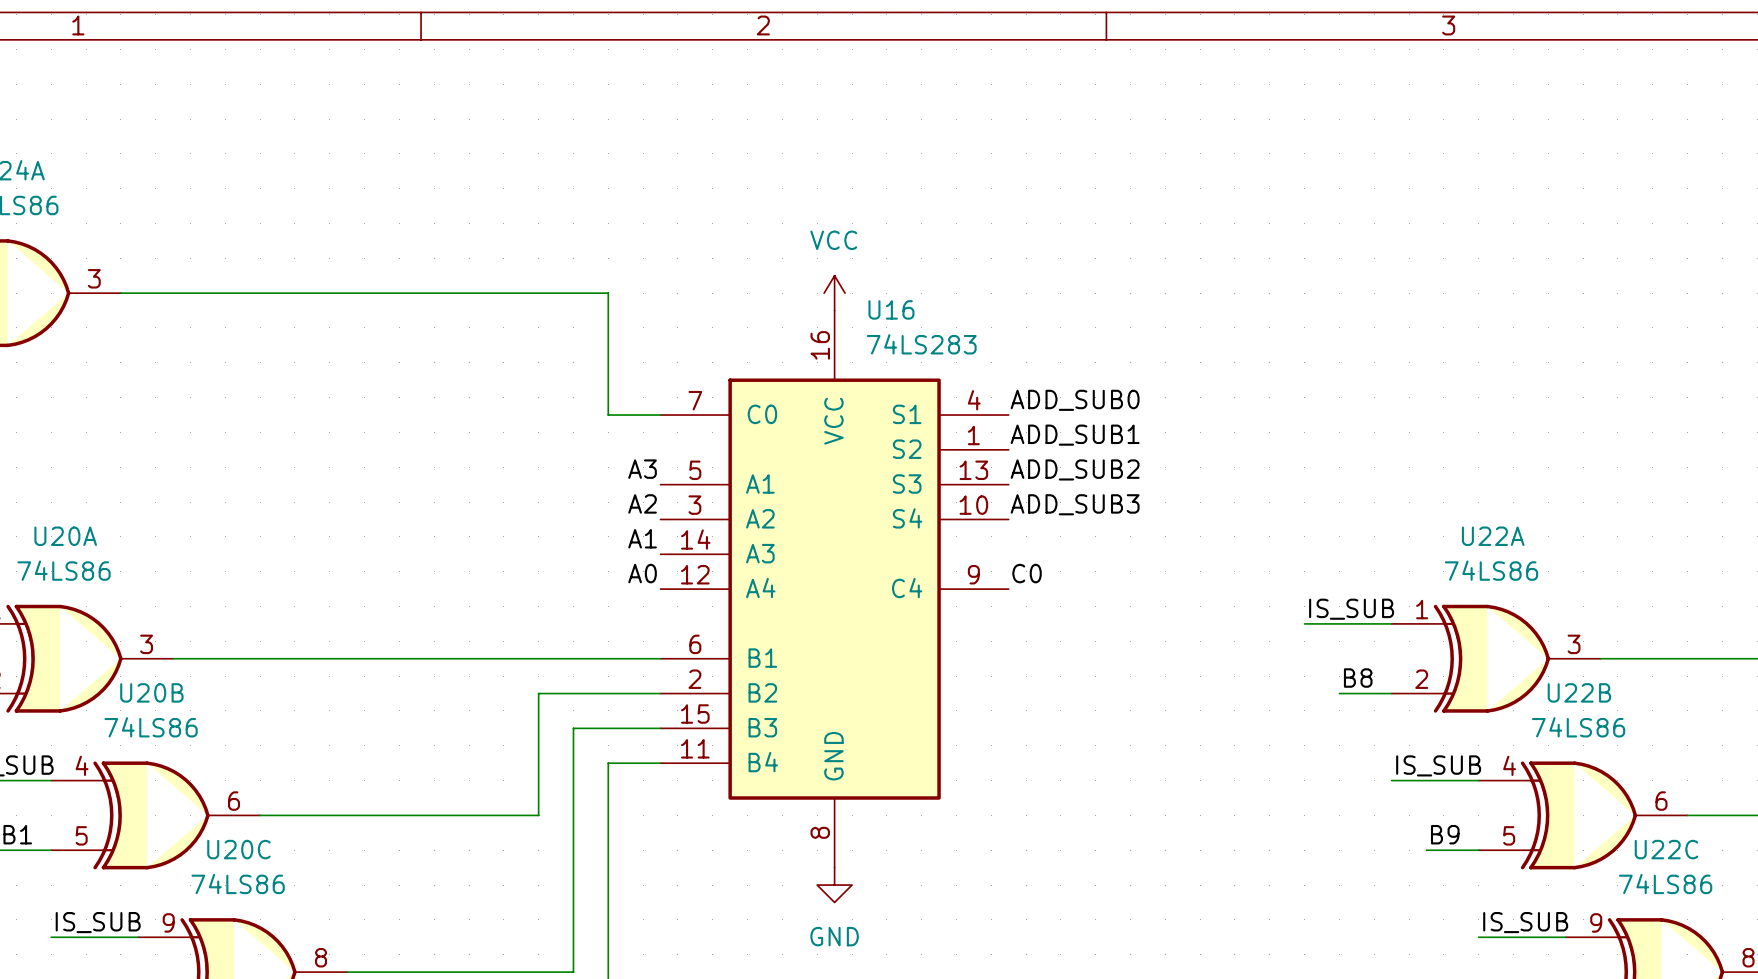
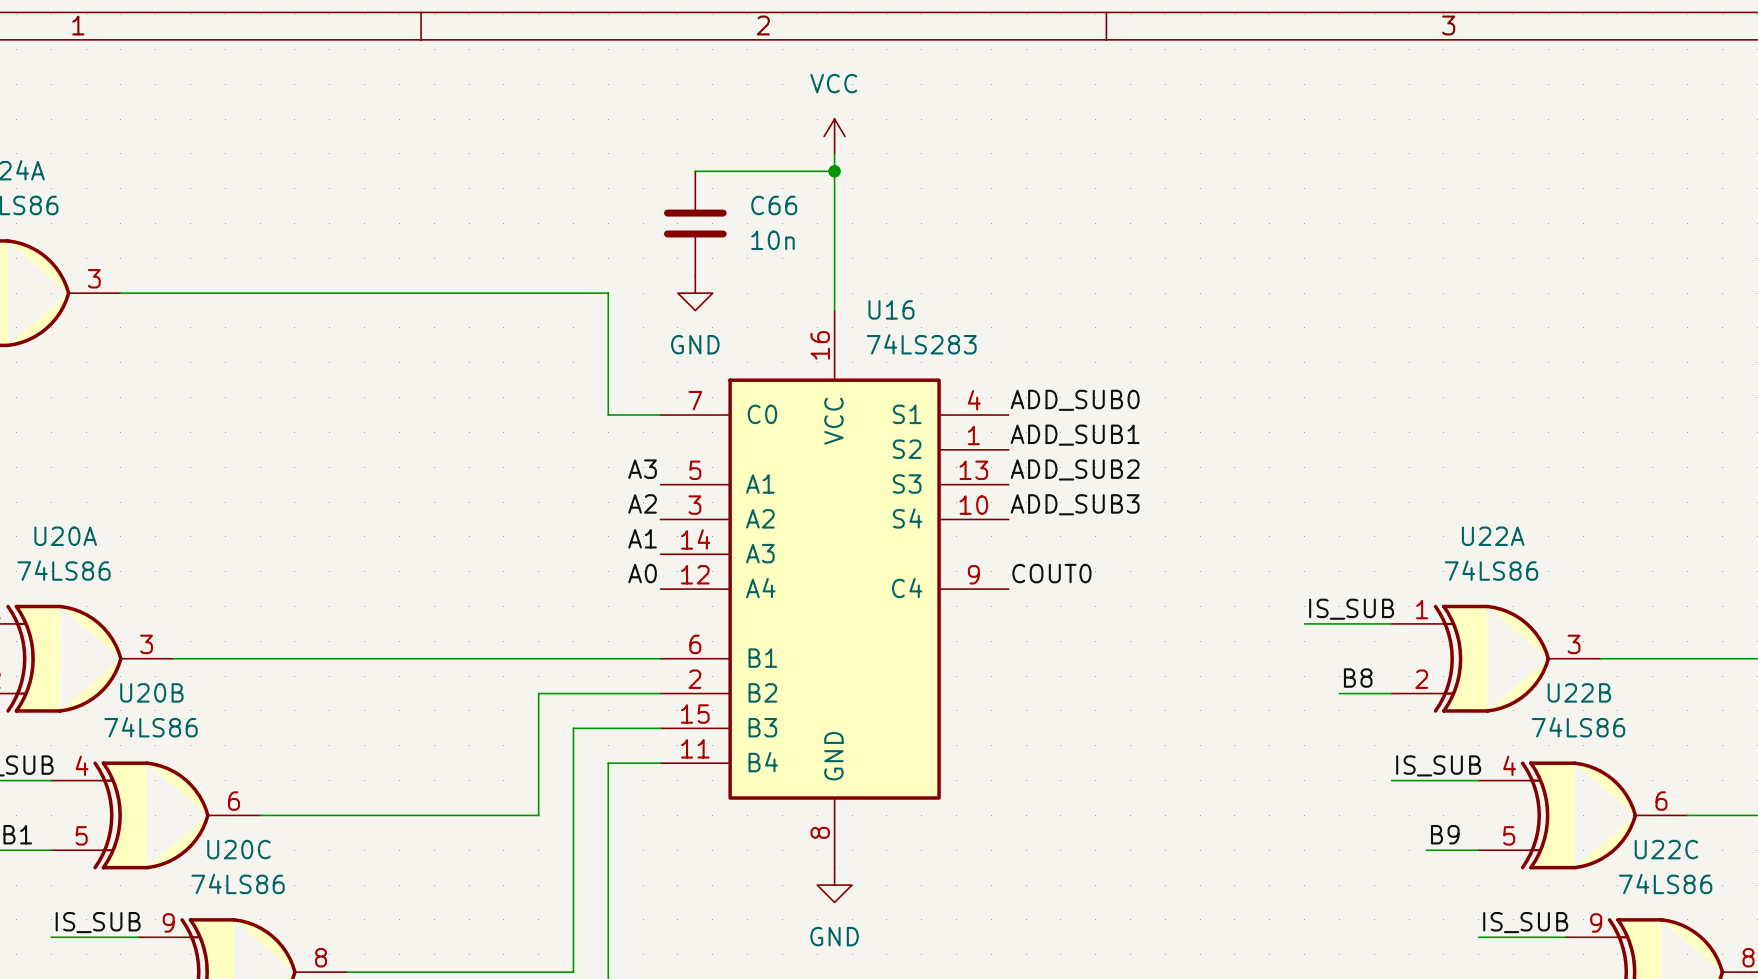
wire: none -> (834, 153) (834, 310)
wire: none -> (695, 171) (834, 171)
junction: none -> (834, 171)
C66: none -> 10n (695, 223)
power symbol: none -> GND (695, 293)
power symbol position: VCC (834, 293) -> VCC (834, 136)
label: C0 (1027, 573) -> COUT0 (1051, 573)

